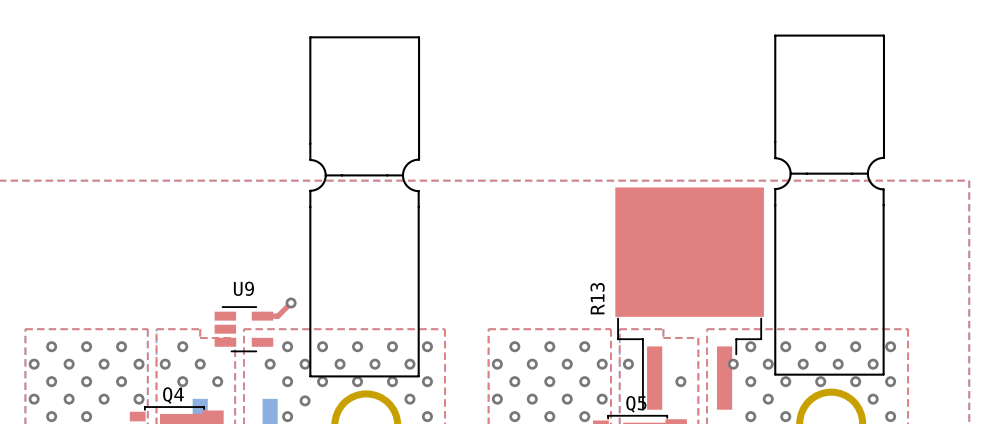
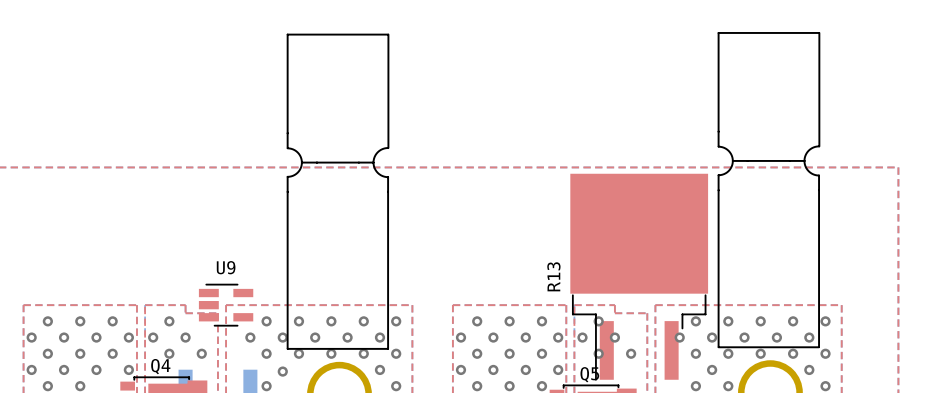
top track: (291, 303) (277, 316) (262, 316) -> none
via: (291, 303) -> none
via: none -> (598, 321)
via: none -> (614, 337)
via: none -> (598, 353)

